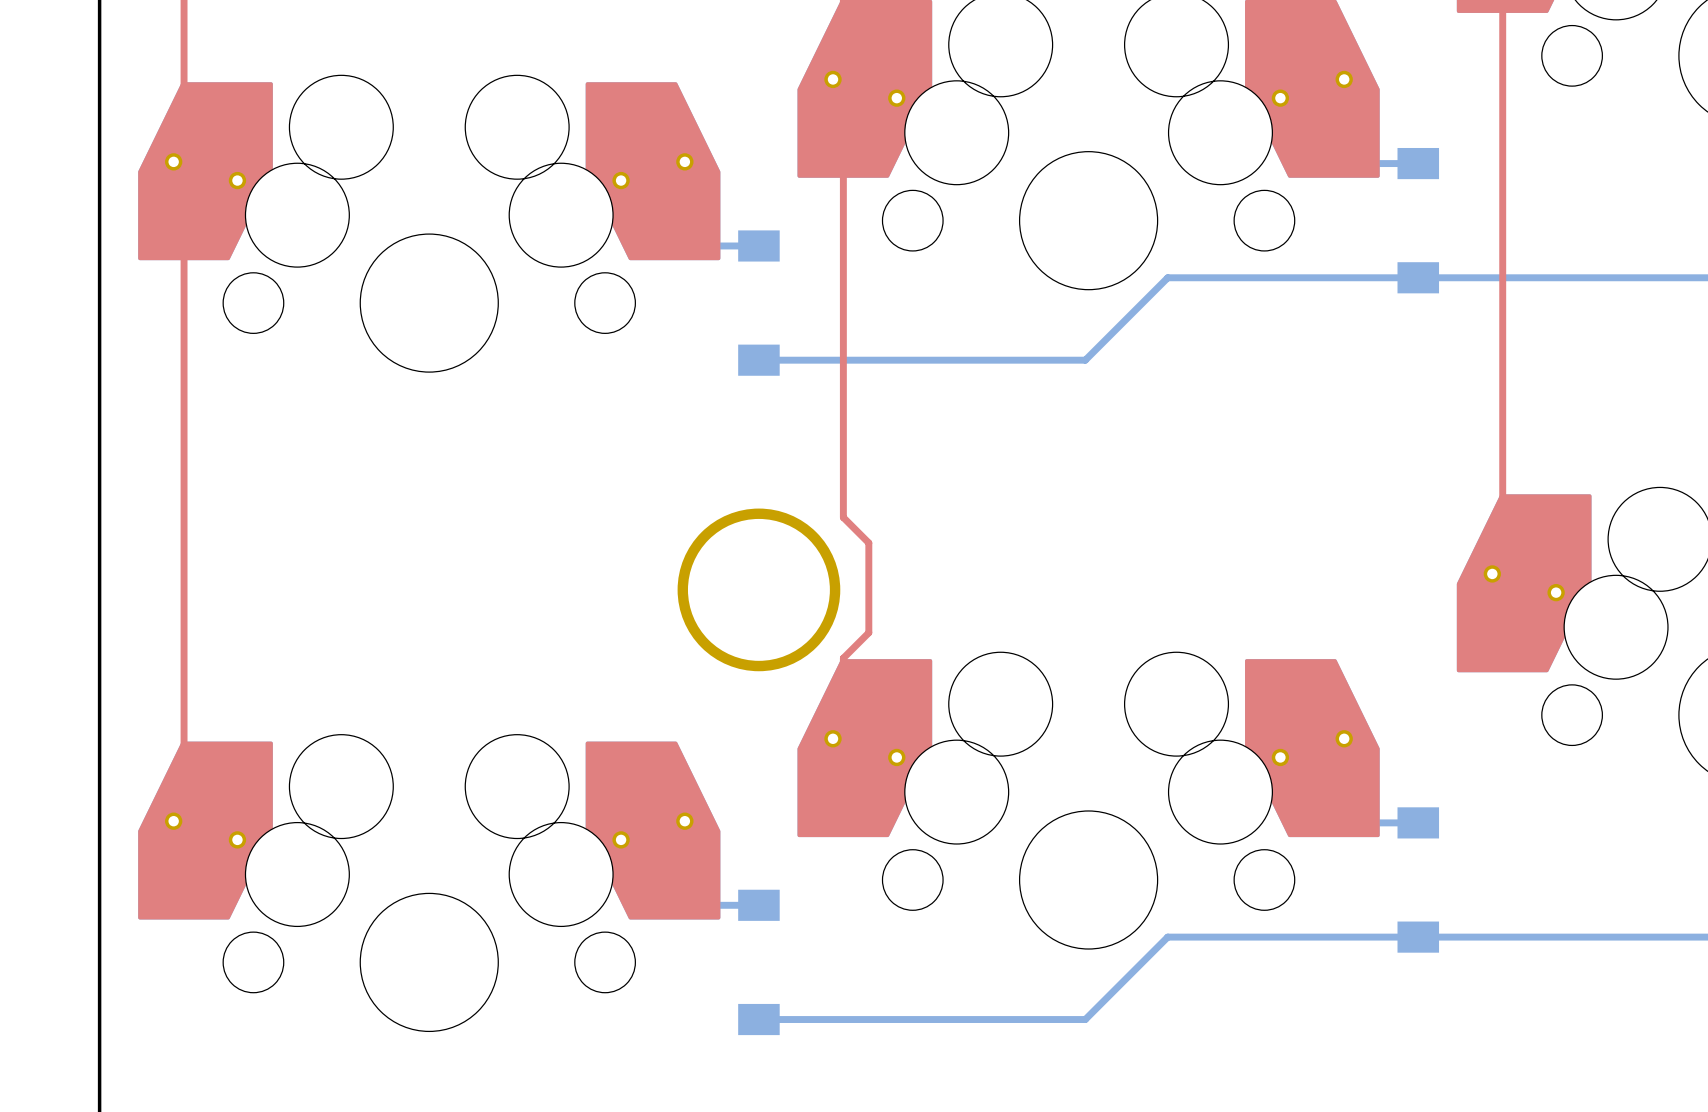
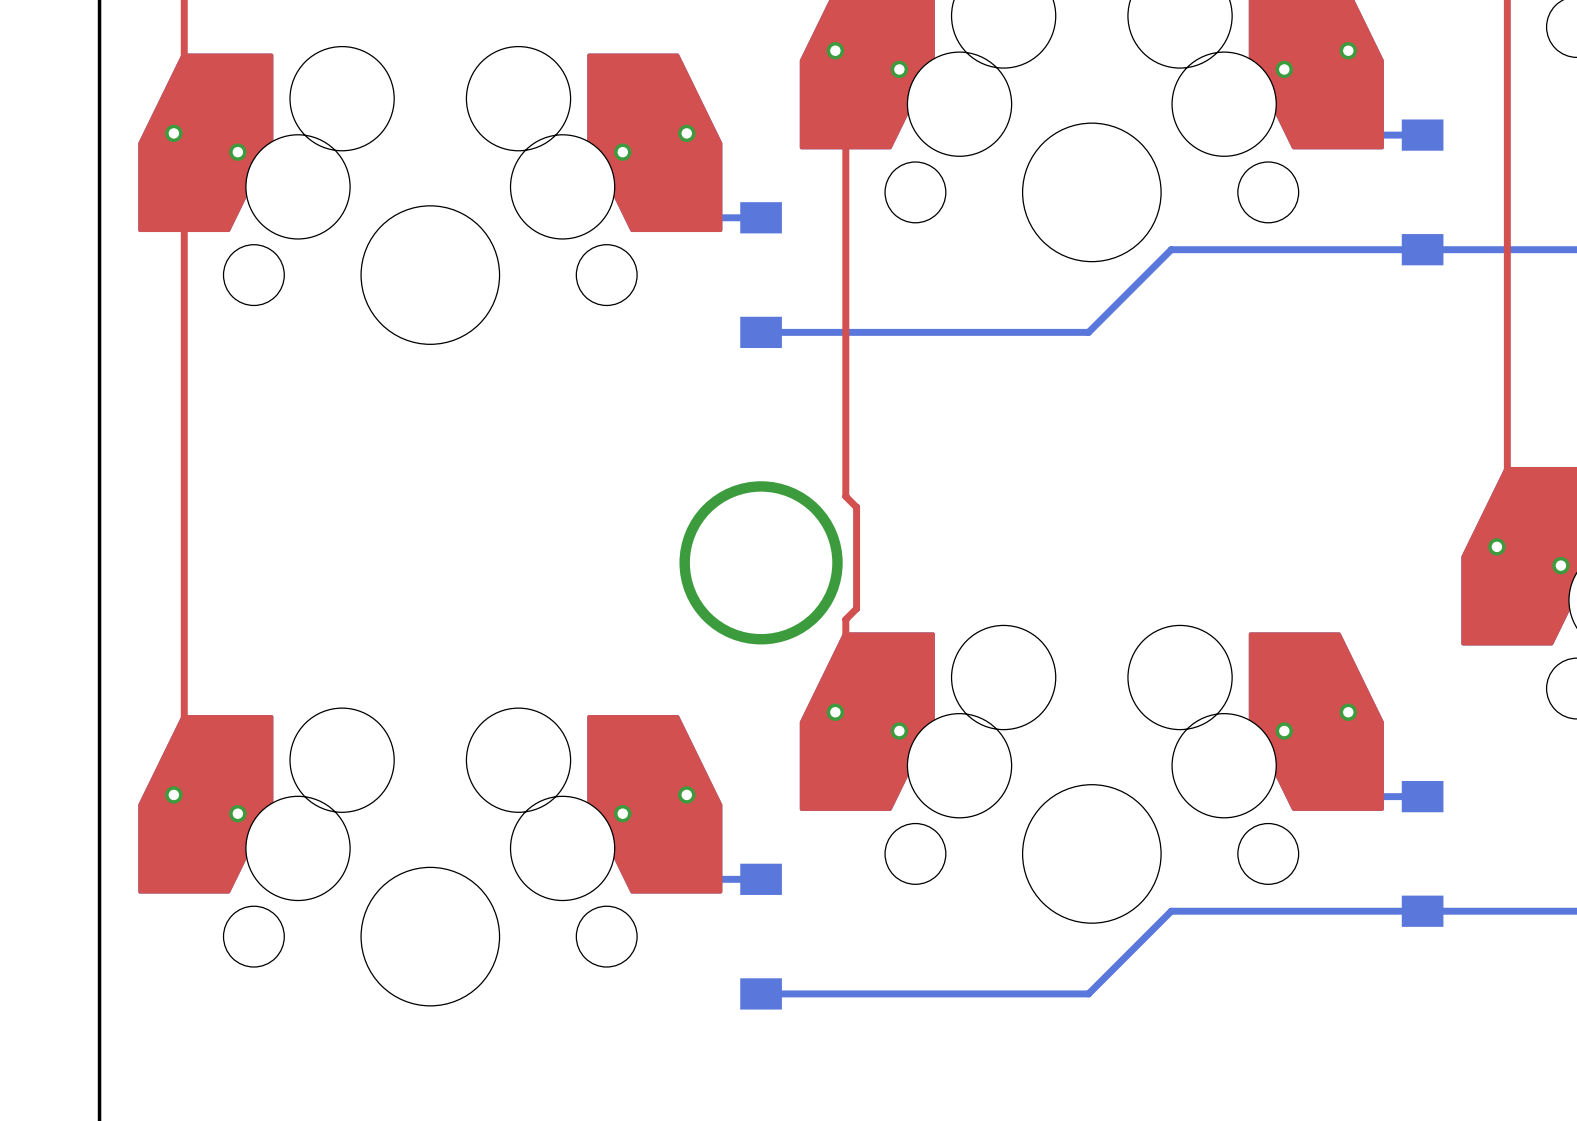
top track: (843, 517) (868, 542) (868, 632) (843, 658) -> (845, 490) (845, 496) (856, 507) (856, 608) (845, 619) (845, 631)

